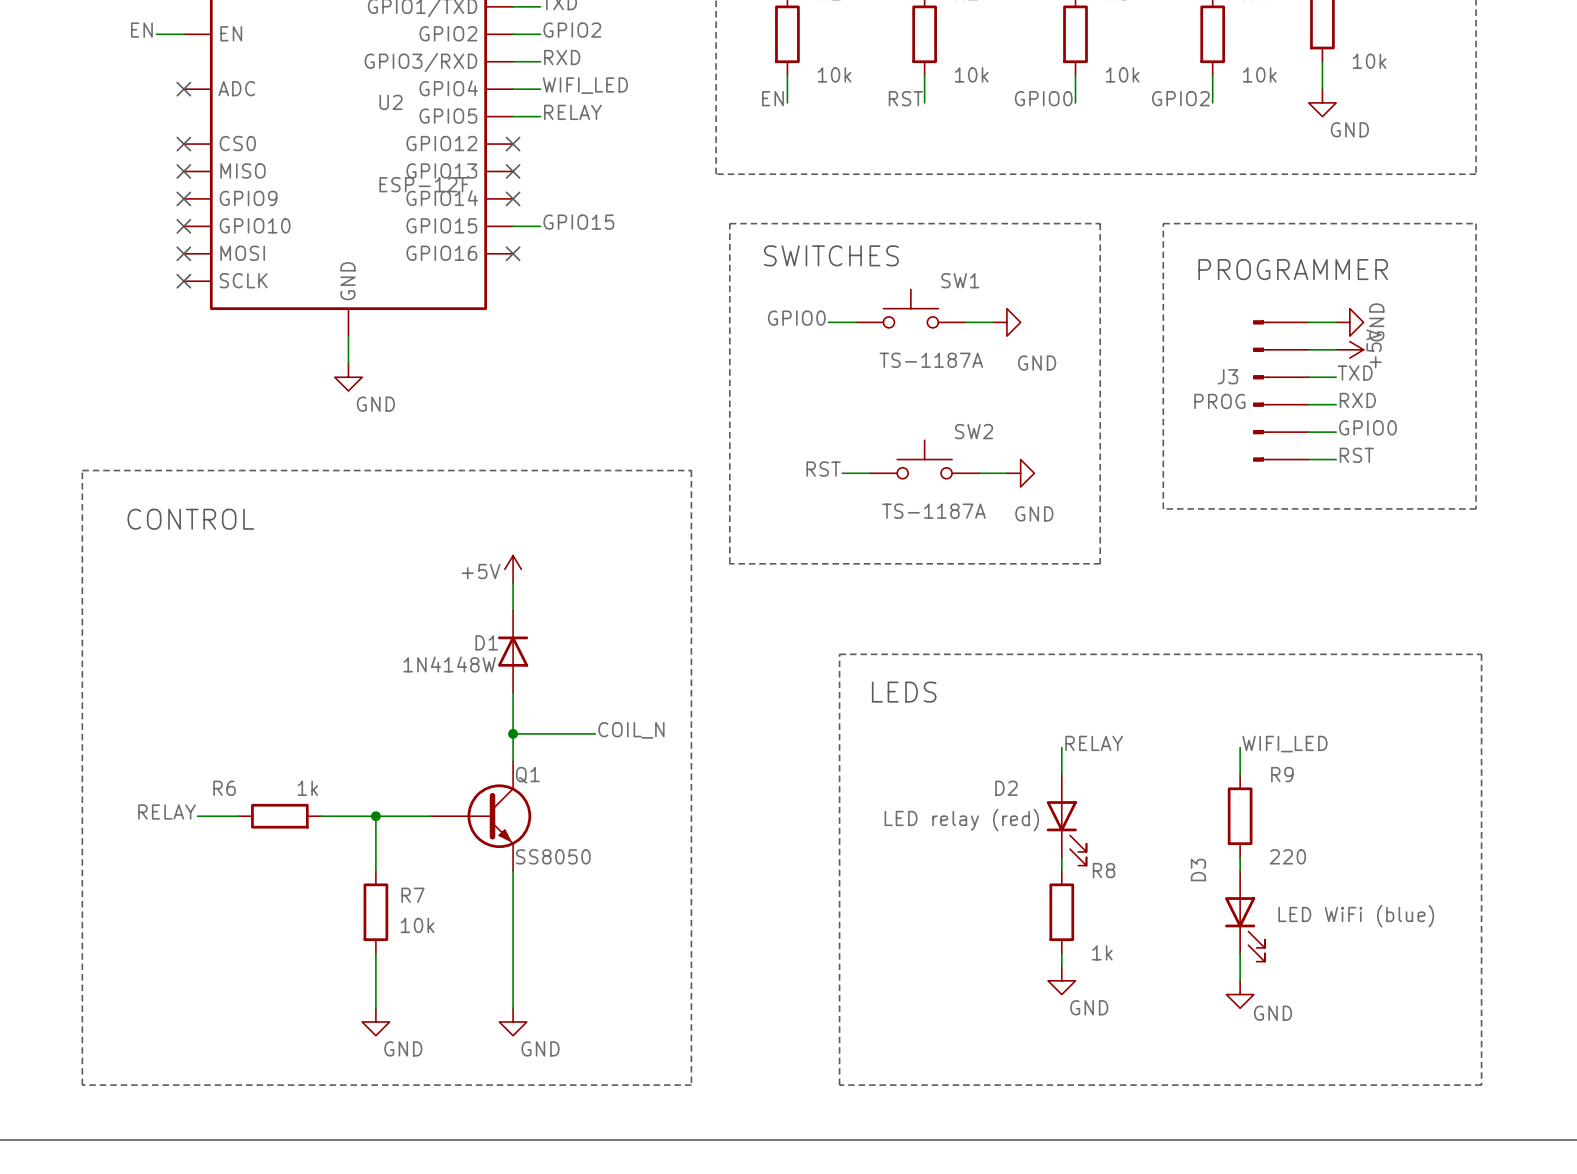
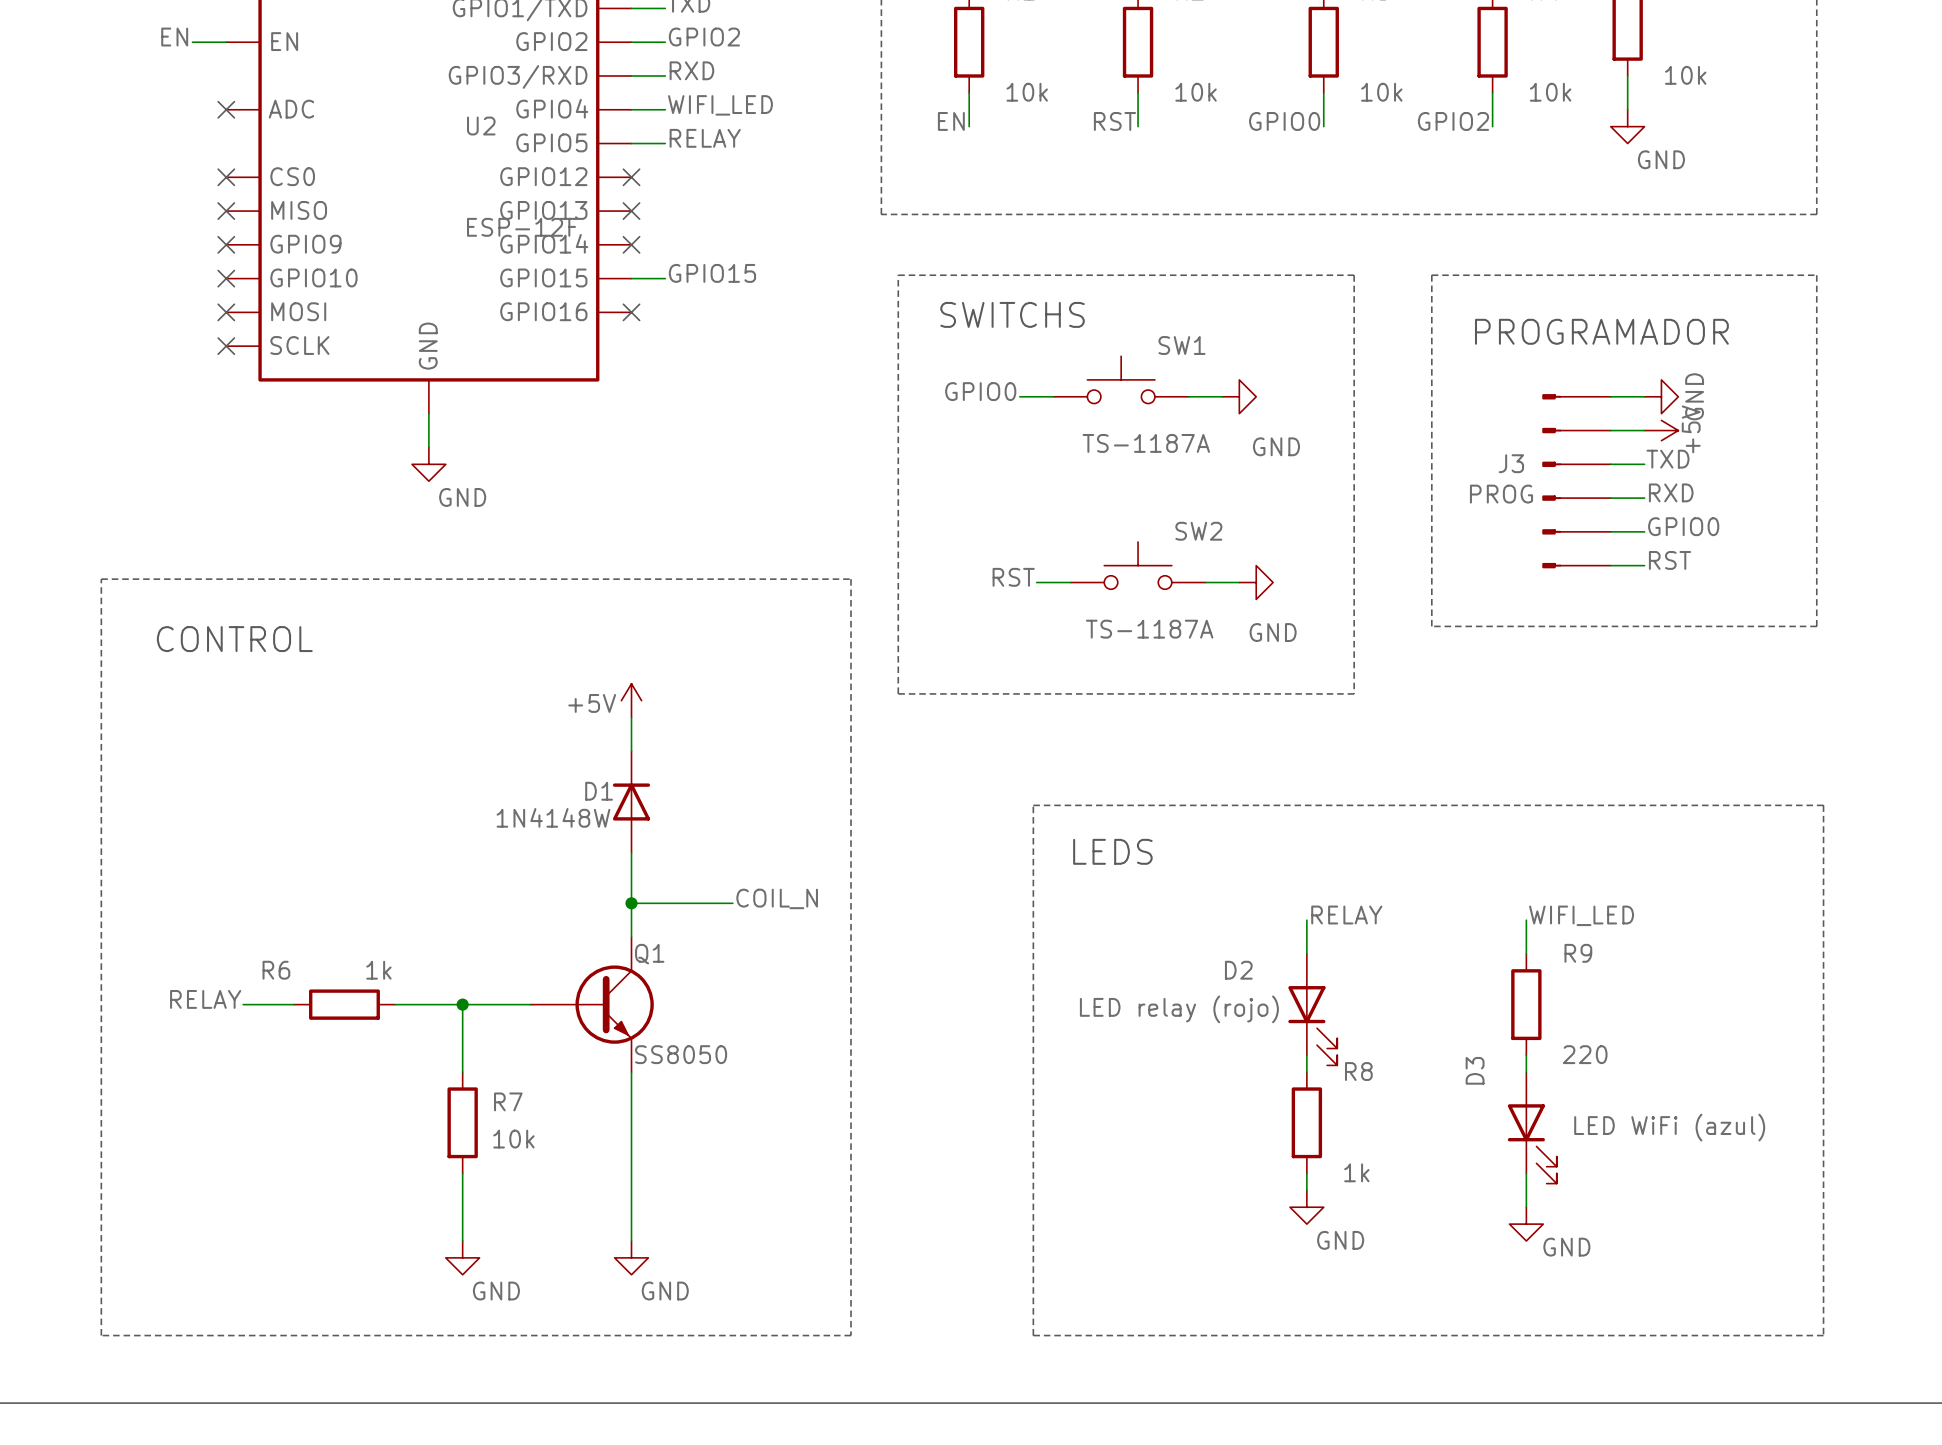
text: SWITCHES (831, 255) -> SWITCHS (1012, 314)
text: PROGRAMMER (1293, 269) -> PROGRAMADOR (1601, 331)
D2 value: LED relay (red) (961, 820) -> LED relay (rojo) (1179, 1009)
D3 value: LED WiFi (blue) (1356, 916) -> LED WiFi (azul) (1669, 1127)

